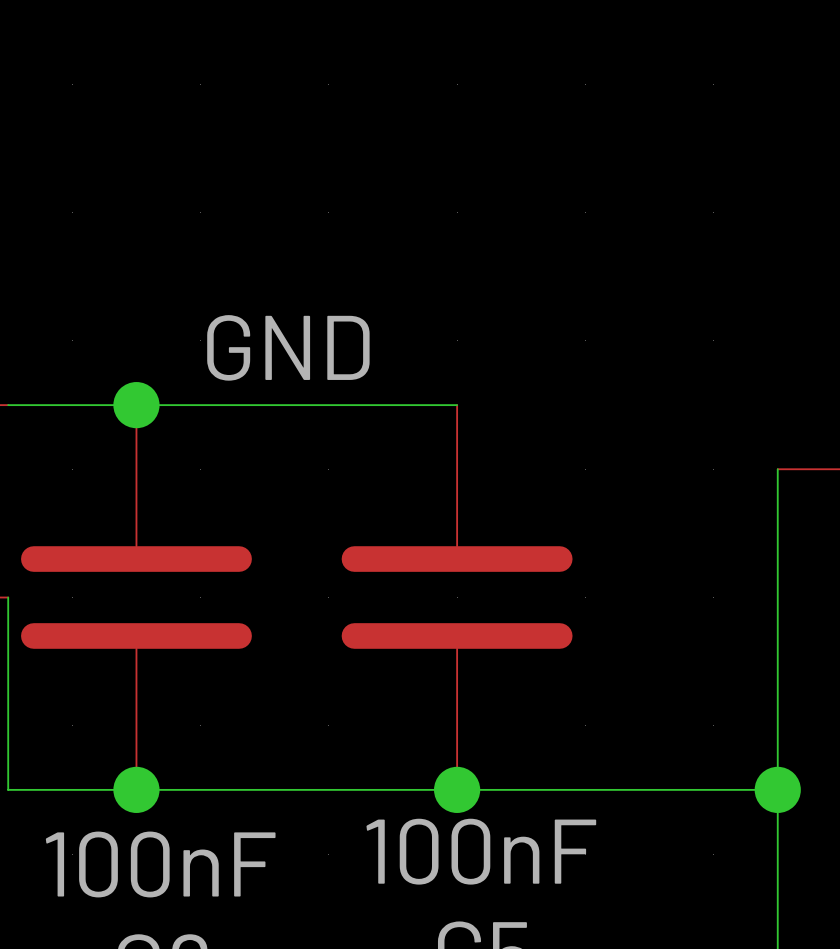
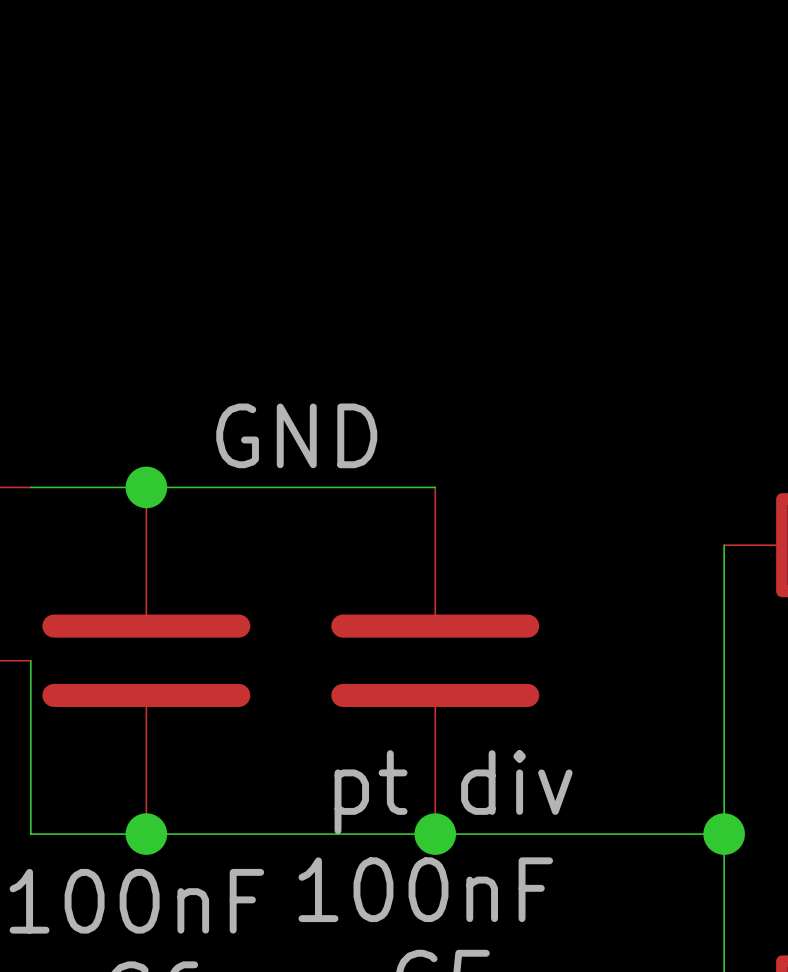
label: none -> pt div (453, 792)

